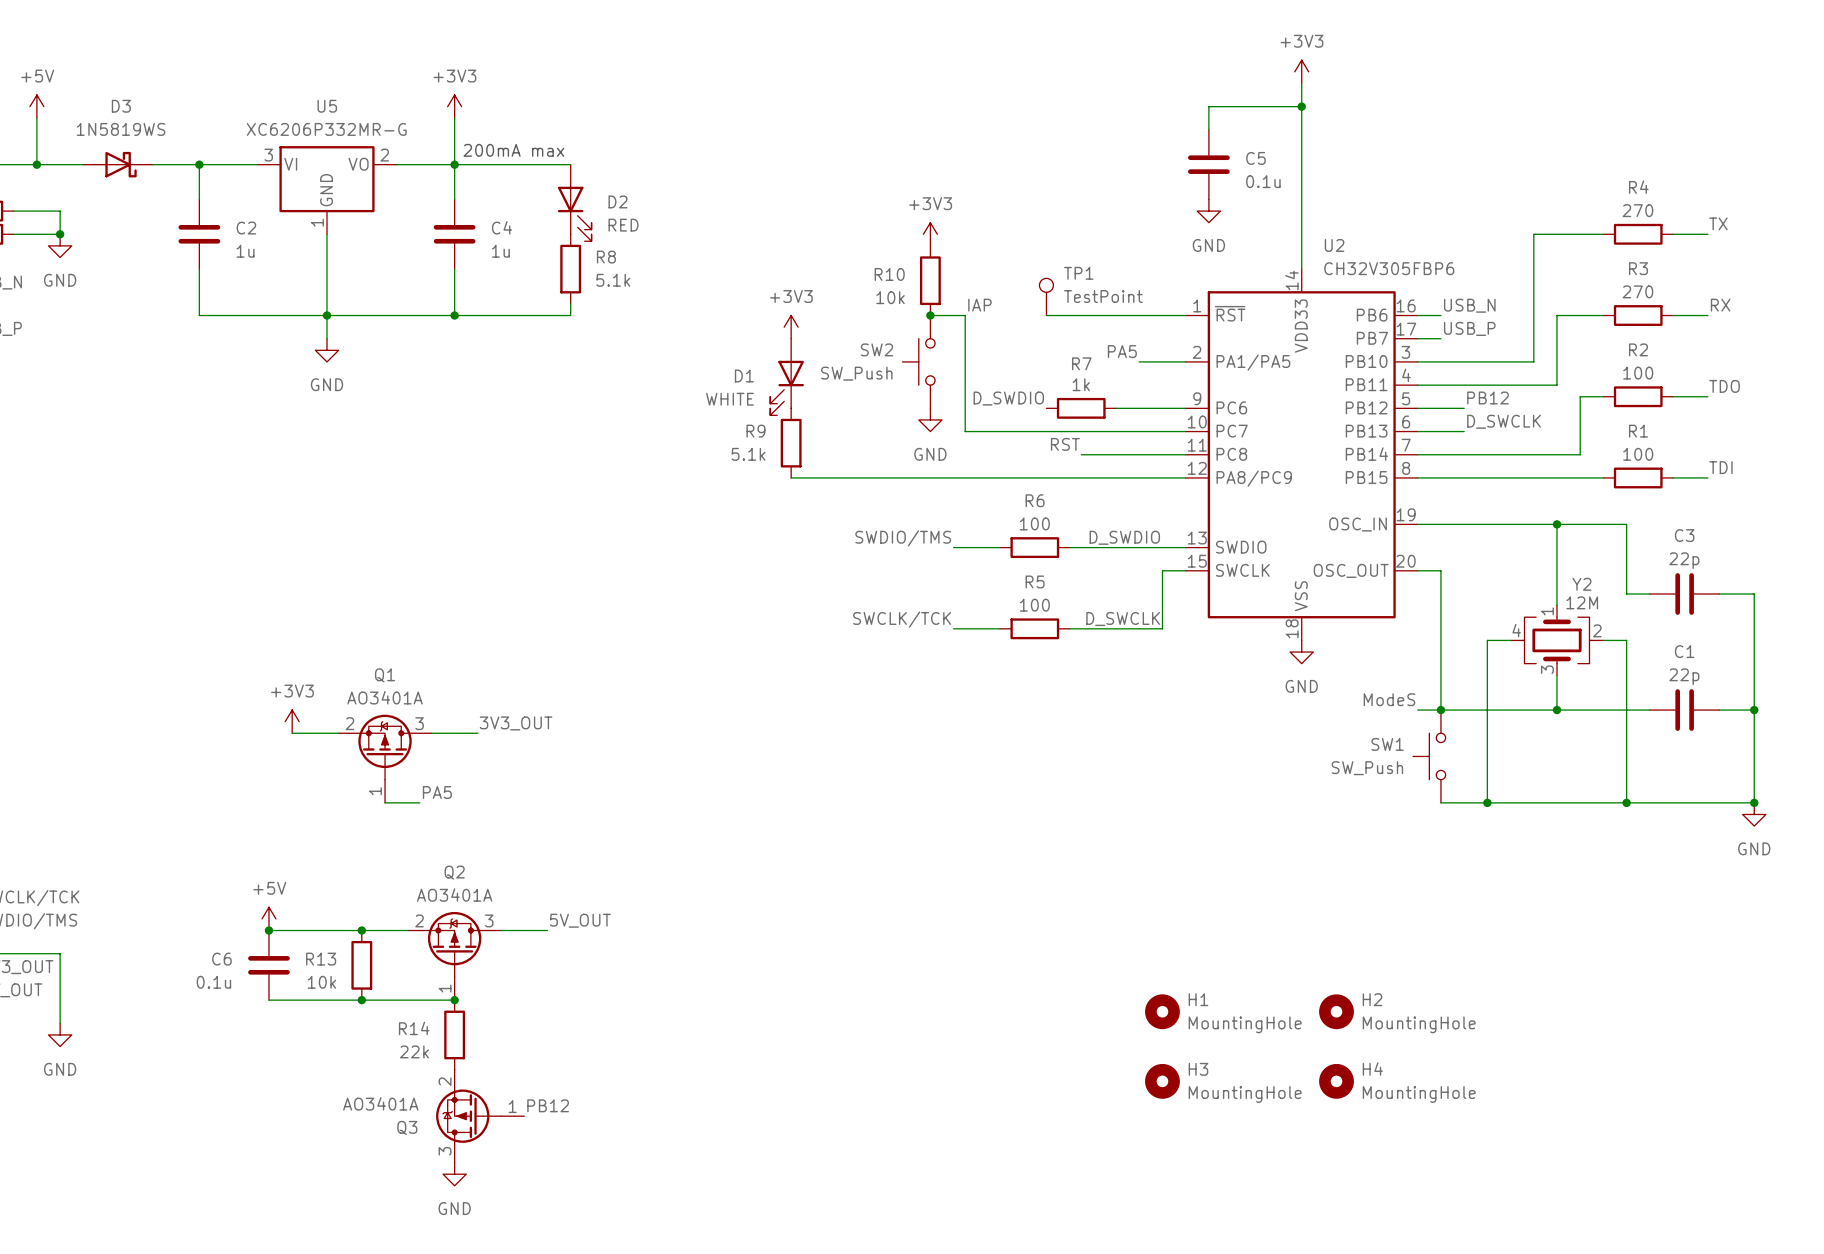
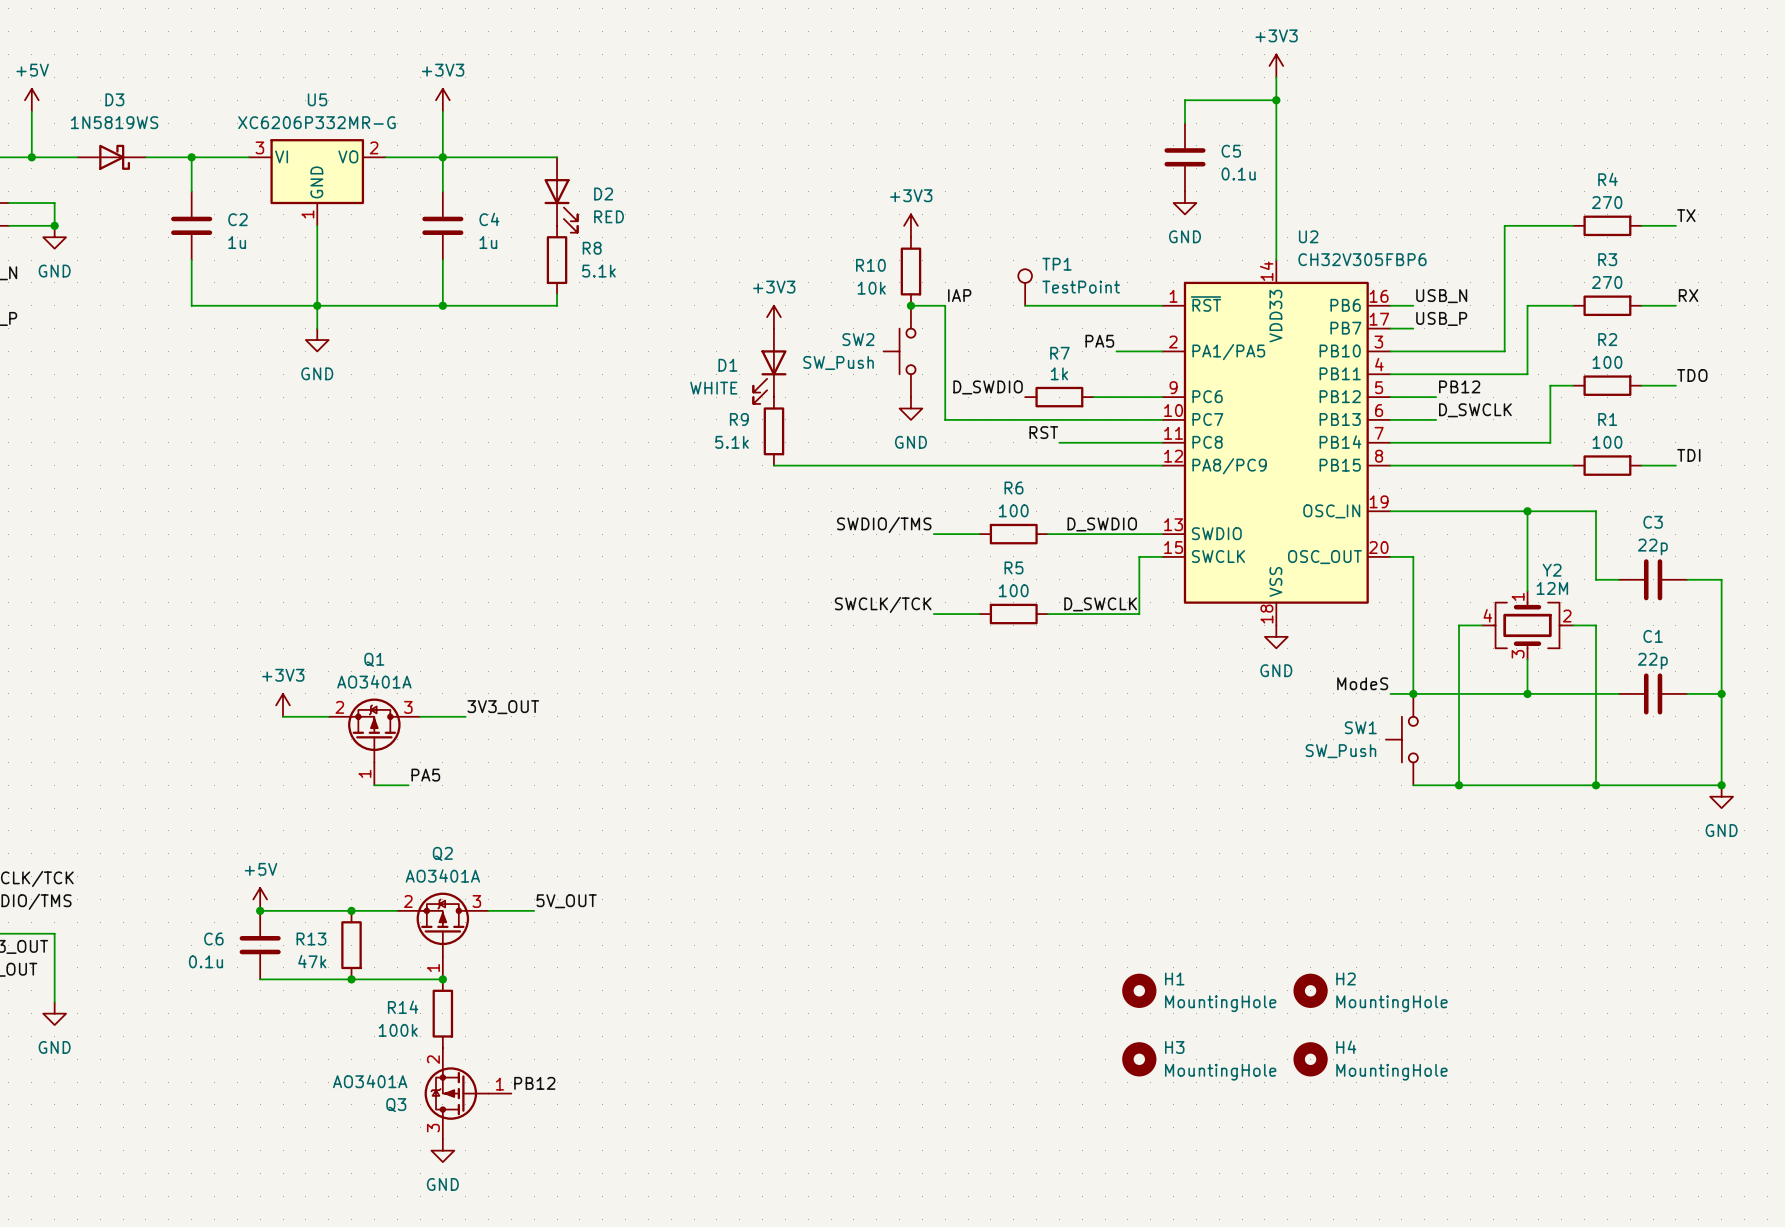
text: 200mA max (513, 150) -> none
R13 value: 10k (321, 982) -> 47k (312, 961)
R14 value: 22k (414, 1051) -> 100k (398, 1030)

